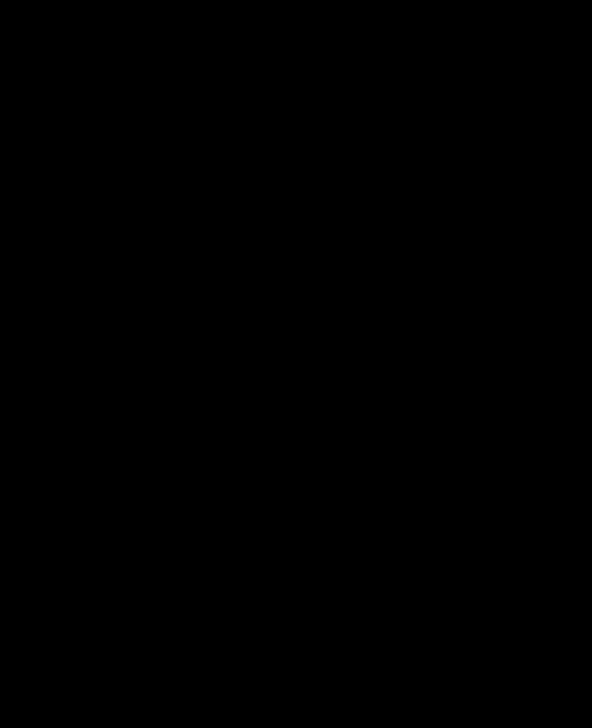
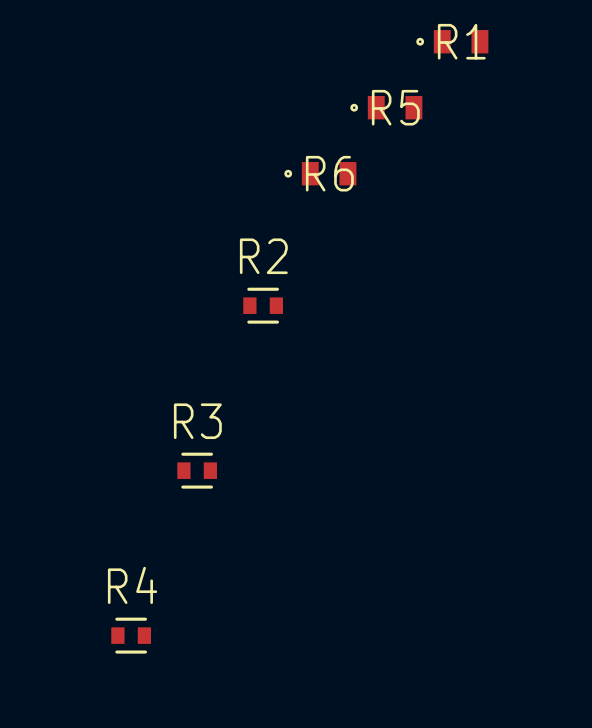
R1: none -> (452, 41)
R5: none -> (386, 107)
R6: none -> (320, 173)
R2: none -> (263, 305)
R3: none -> (197, 470)
R4: none -> (131, 635)

